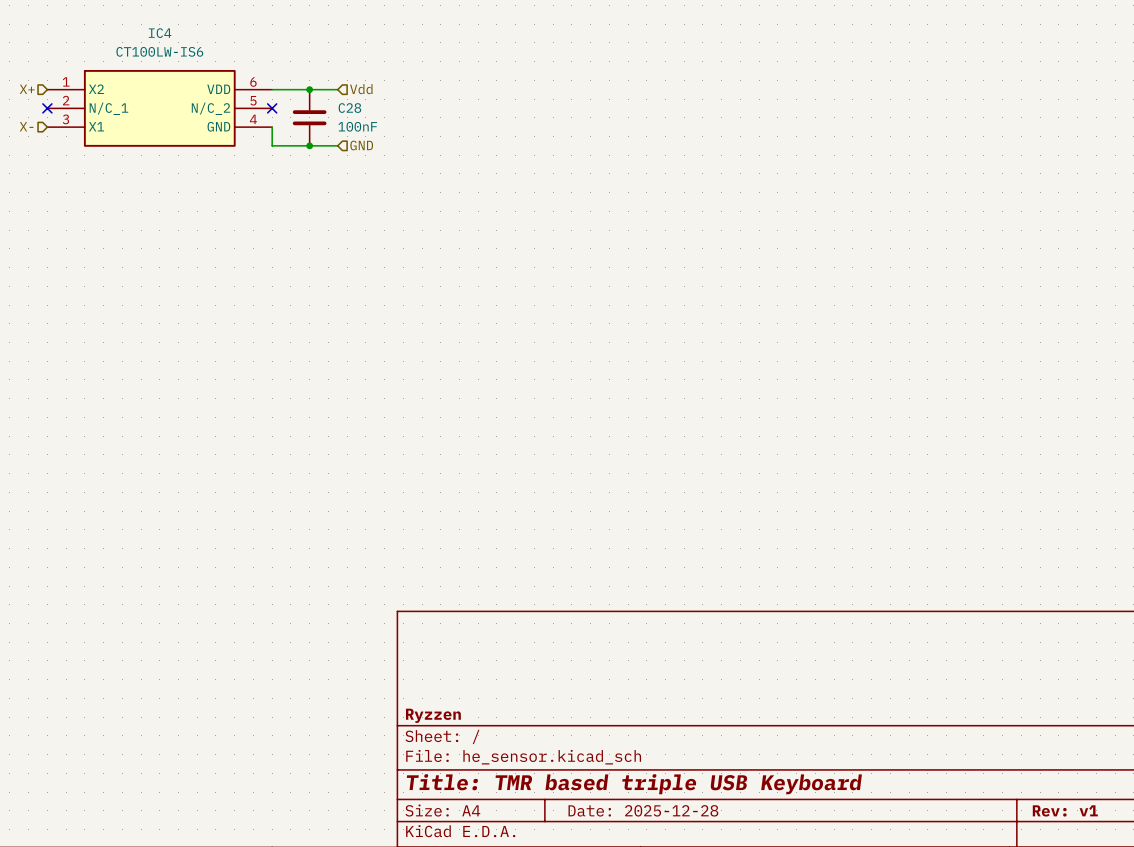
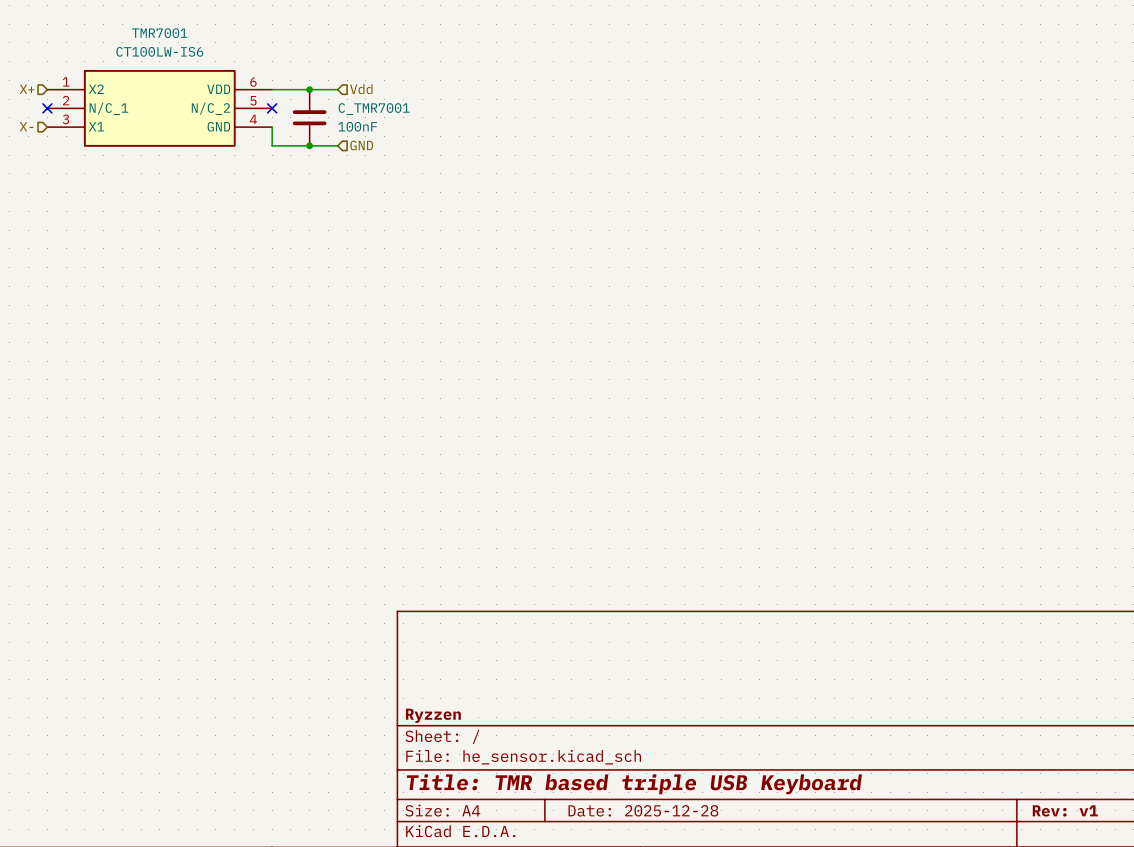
IC4 name: IC4 (160, 33) -> TMR7001 (159, 33)
C28 name: C28 (349, 108) -> C_TMR7001 (374, 109)

